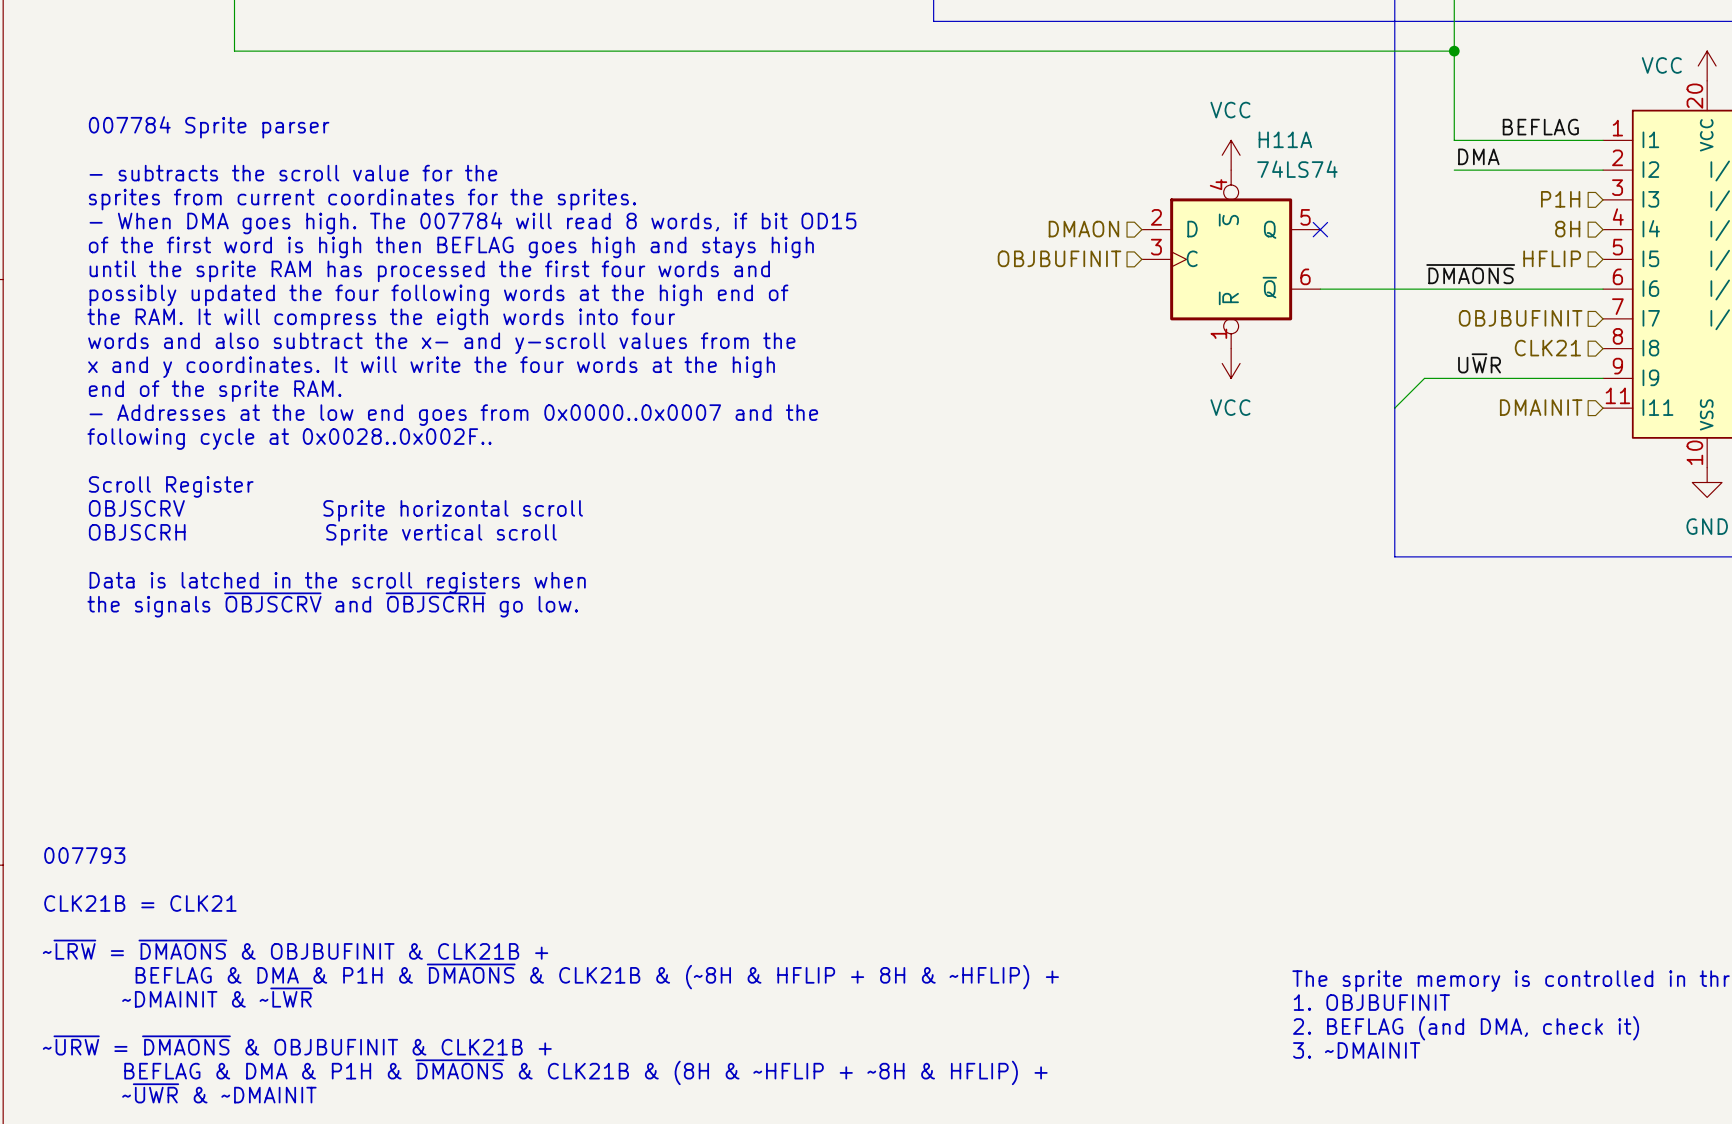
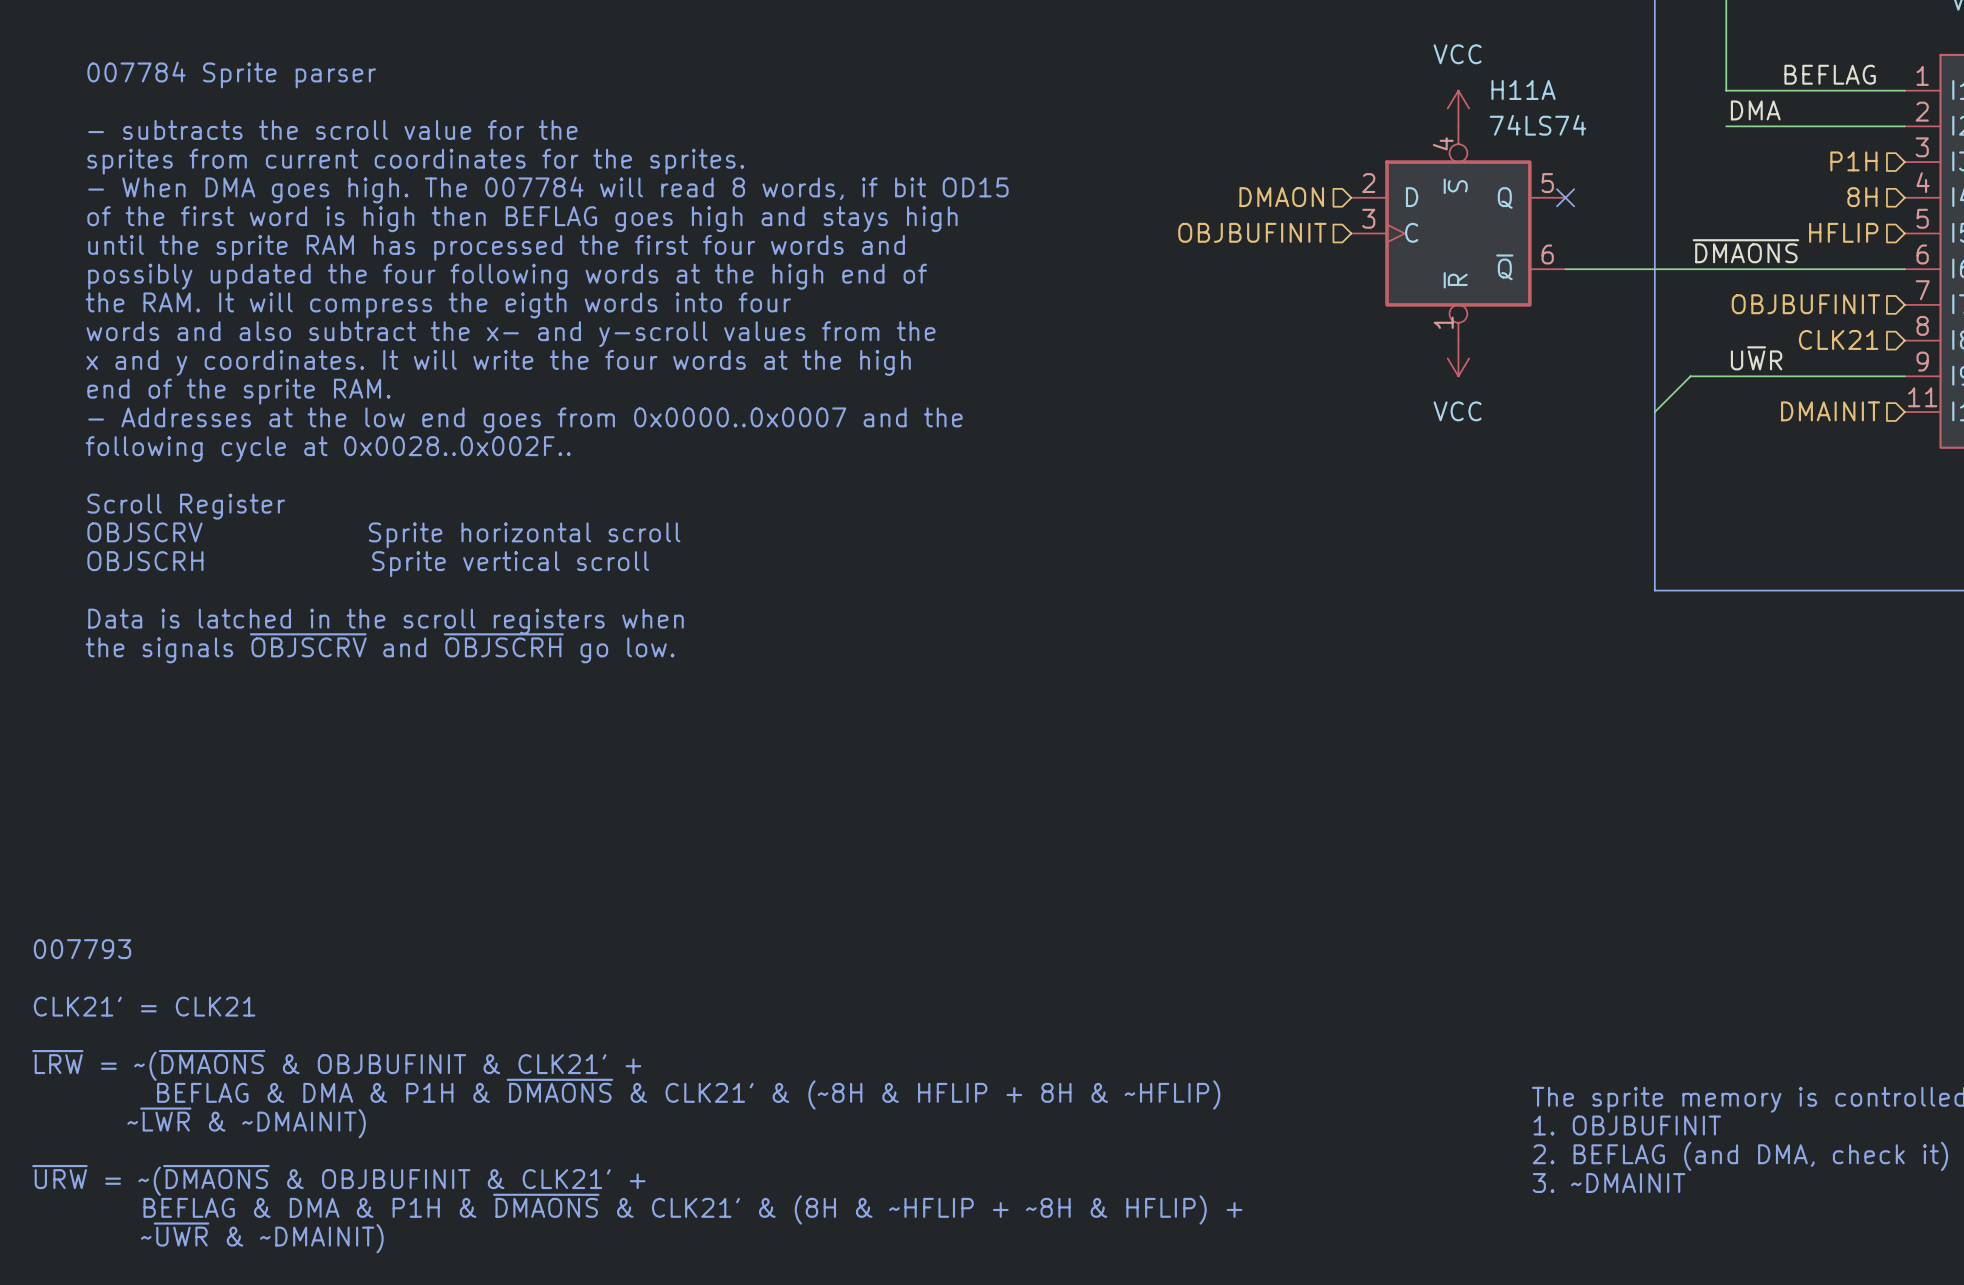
text: CLK21B = CLK21 (140, 903) -> CLK21' = CLK21 (144, 1006)
text: ~~{LRW} = ~{DMAONS} & OBJBUFINIT & CLK21B + (295, 949) -> ~{LRW} = ~(~{DMAONS} & OBJBUFINIT & CLK21' + (336, 1065)
text: BEFLAG & DMA & P1H & ~{DMAONS} & CLK21B & (~8H & HFLIP + 8H & ~HFLIP) + (597, 976) -> BEFLAG & DMA & P1H & ~{DMAONS} & CLK21' & (~8H & HFLIP + 8H & ~HFLIP) (688, 1094)
text: ~DMAINIT & ~~{LWR} (217, 997) -> ~~{LWR} & ~DMAINIT) (246, 1122)
text: ~~{URW} = ~{DMAONS} & OBJBUFINIT & CLK21B + (297, 1045) -> ~{URW} = ~(~{DMAONS} & OBJBUFINIT & CLK21' + (338, 1180)
text: BEFLAG & DMA & P1H & ~{DMAONS} & CLK21B & (8H & ~HFLIP + ~8H & HFLIP) + (585, 1072) -> BEFLAG & DMA & P1H & ~{DMAONS} & CLK21' & (8H & ~HFLIP + ~8H & HFLIP) + (692, 1209)
text: ~~{UWR} & ~DMAINIT (219, 1093) -> ~~{UWR} & ~DMAINIT) (262, 1237)

